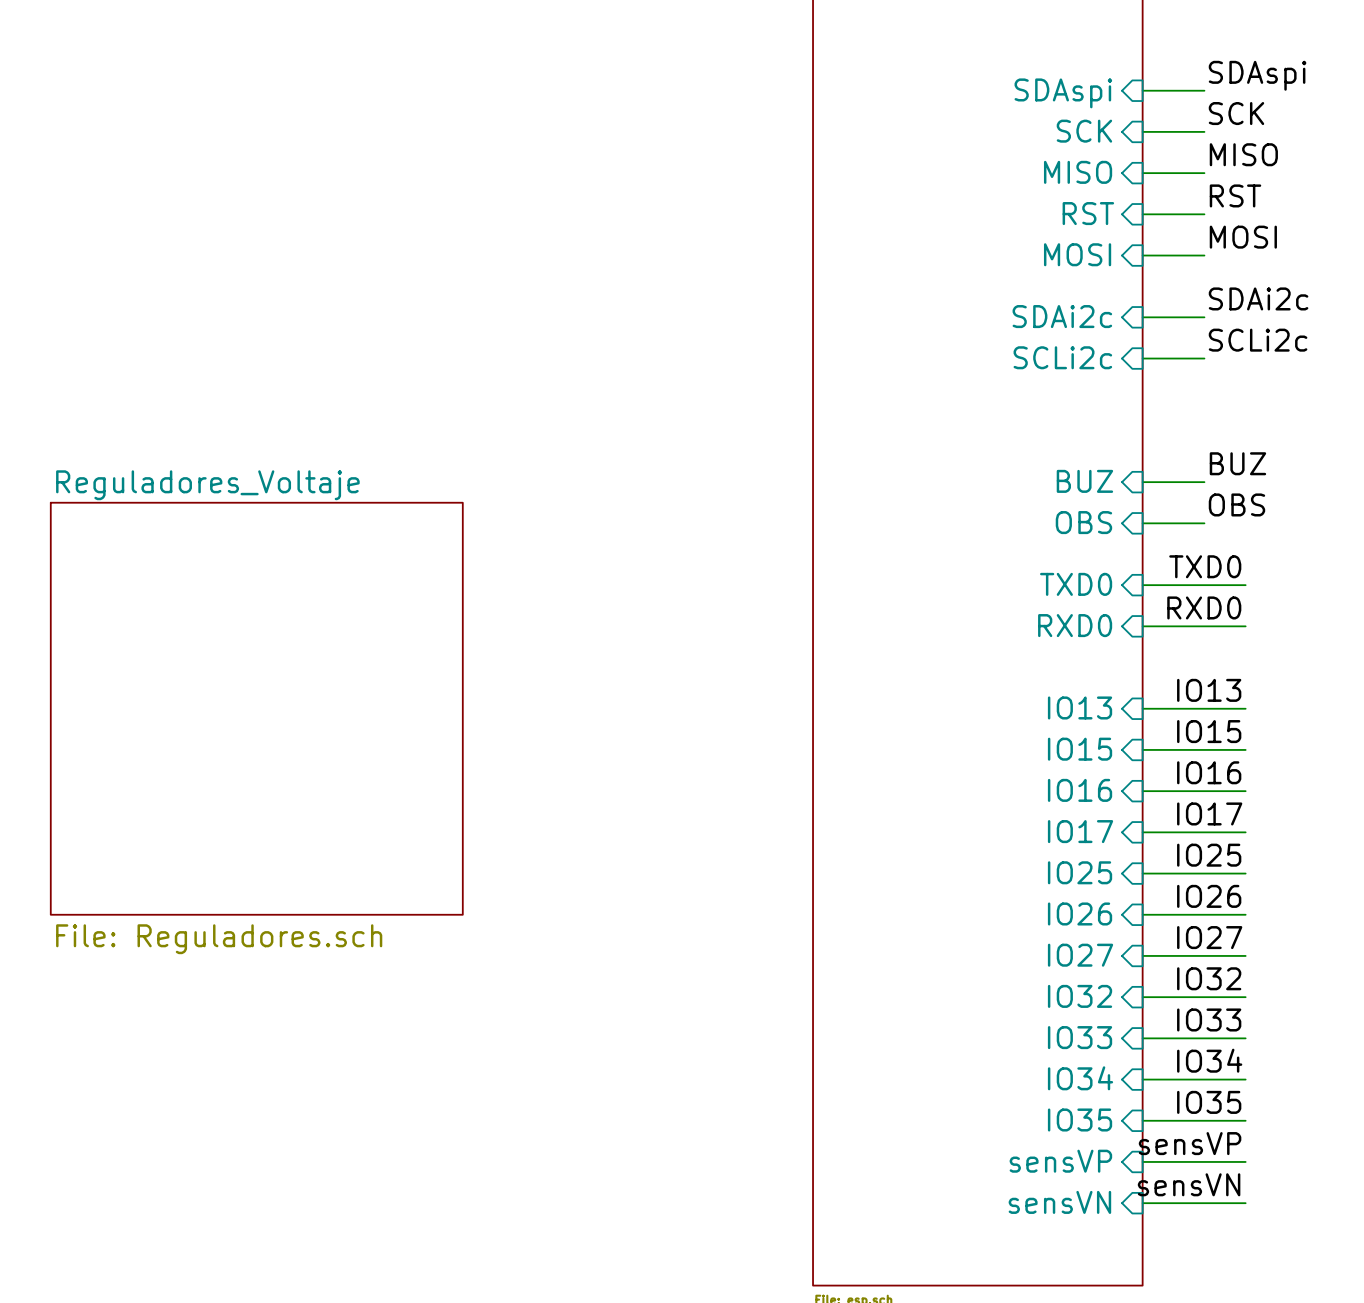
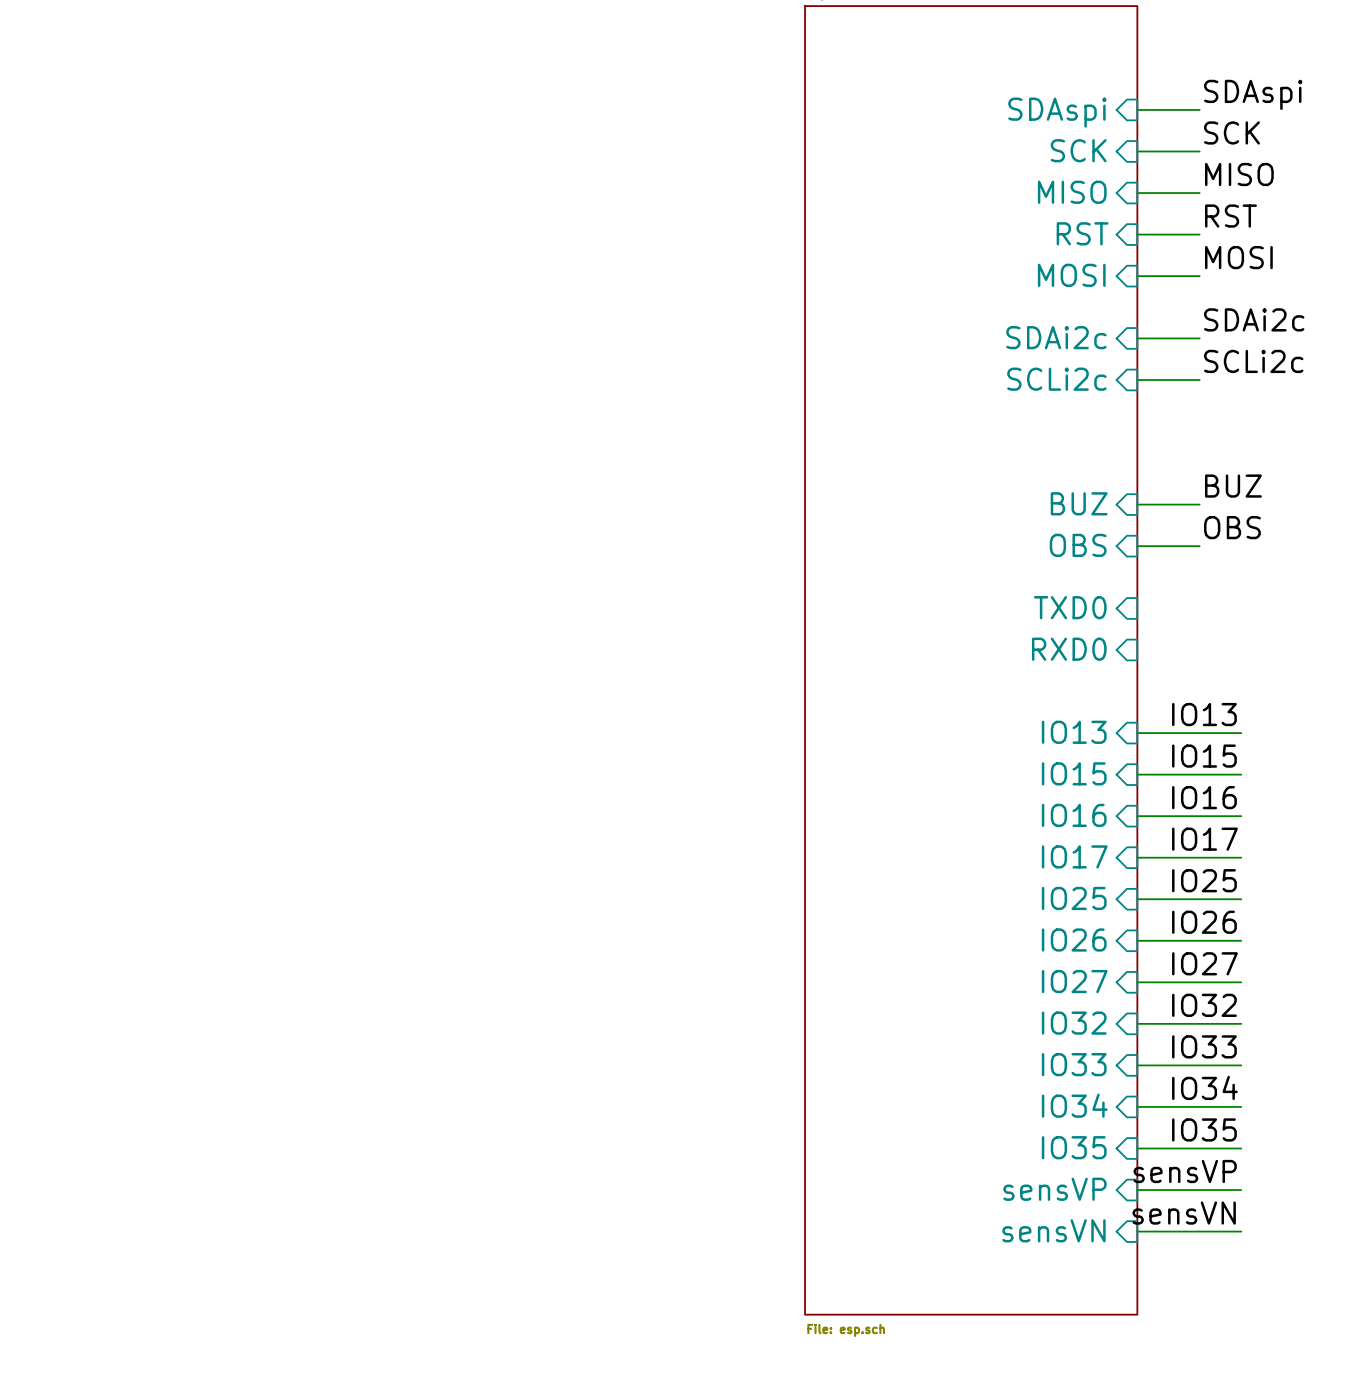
label: TXD0 (1205, 566) -> none
wire: (1142, 585) (1245, 585) -> none
label: RXD0 (1204, 607) -> none
wire: (1142, 626) (1245, 626) -> none
sheet Reguladores_Voltaje: File: Reguladores.sch (256, 708) -> none

